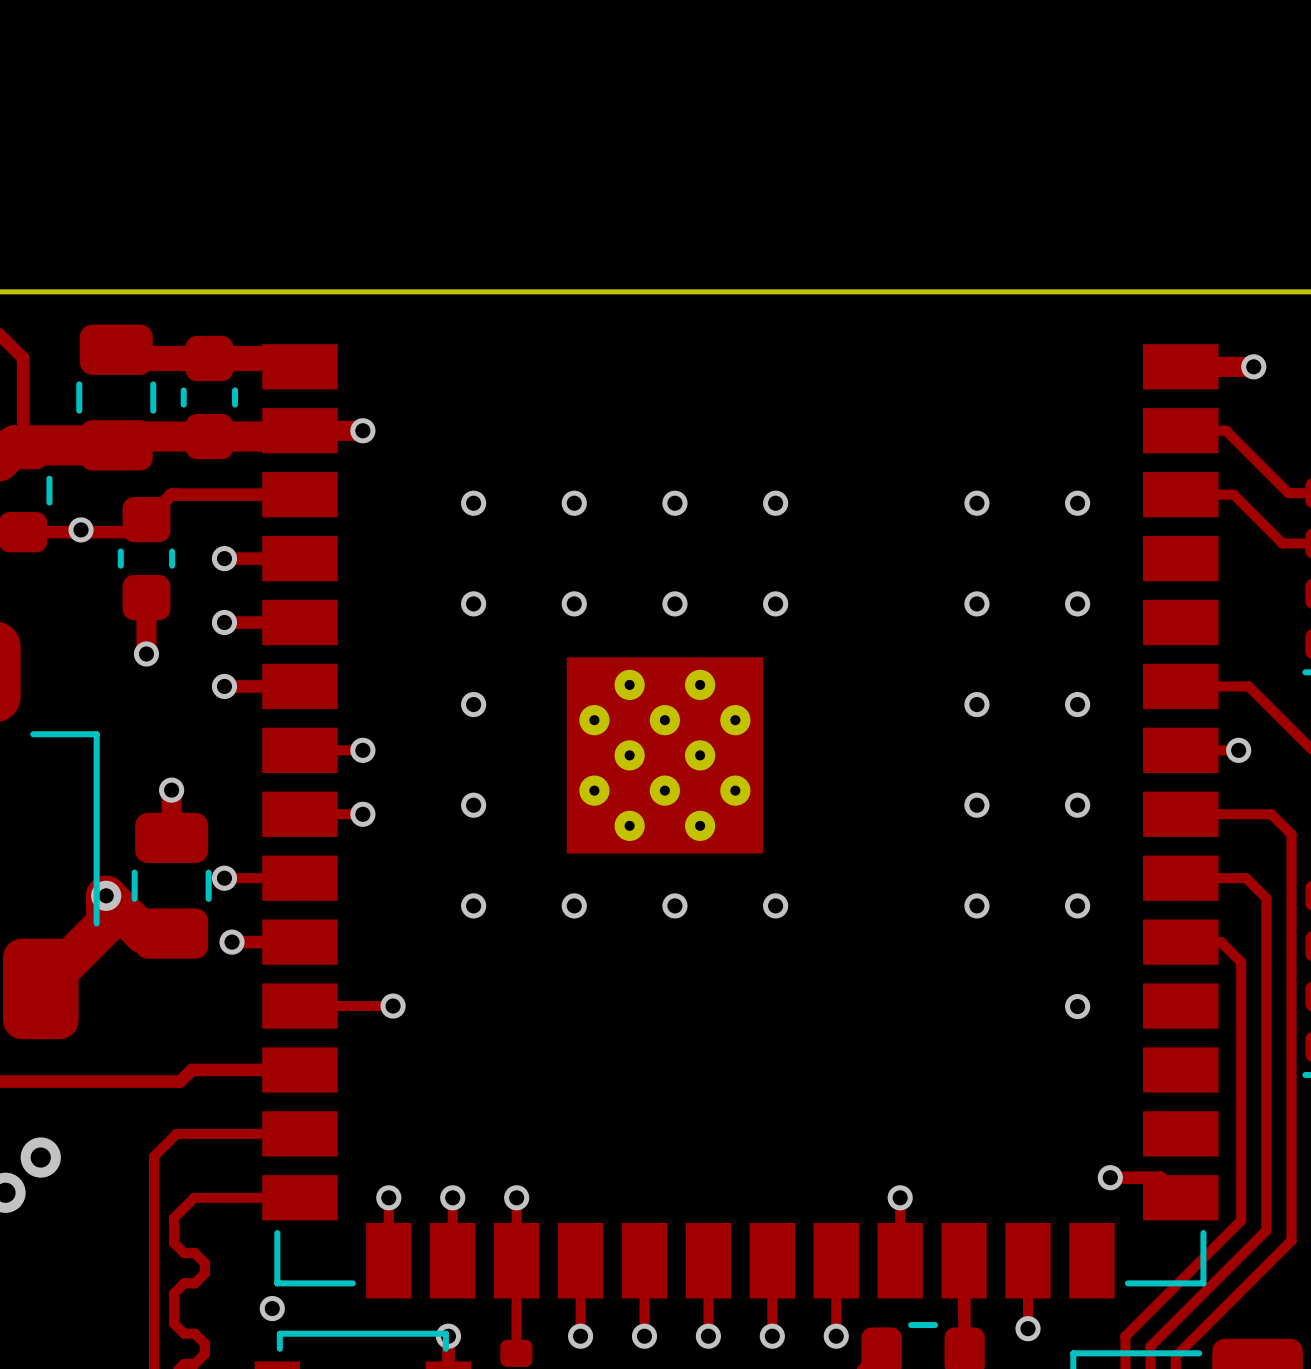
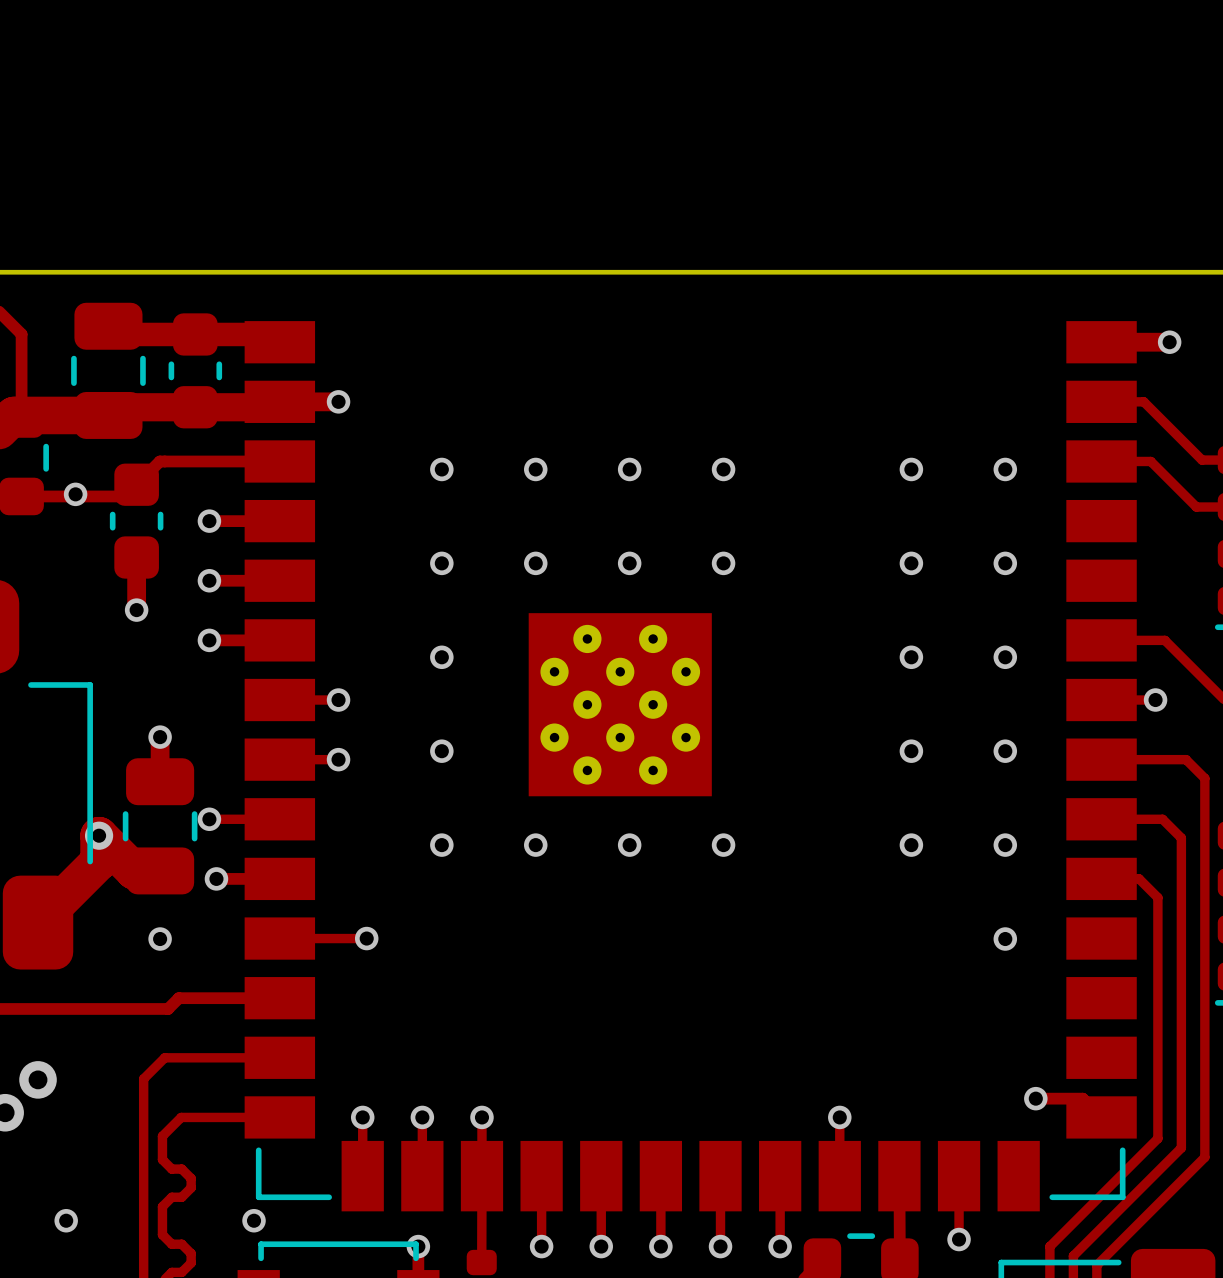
via: none -> (160, 939)
via: none -> (66, 1220)

